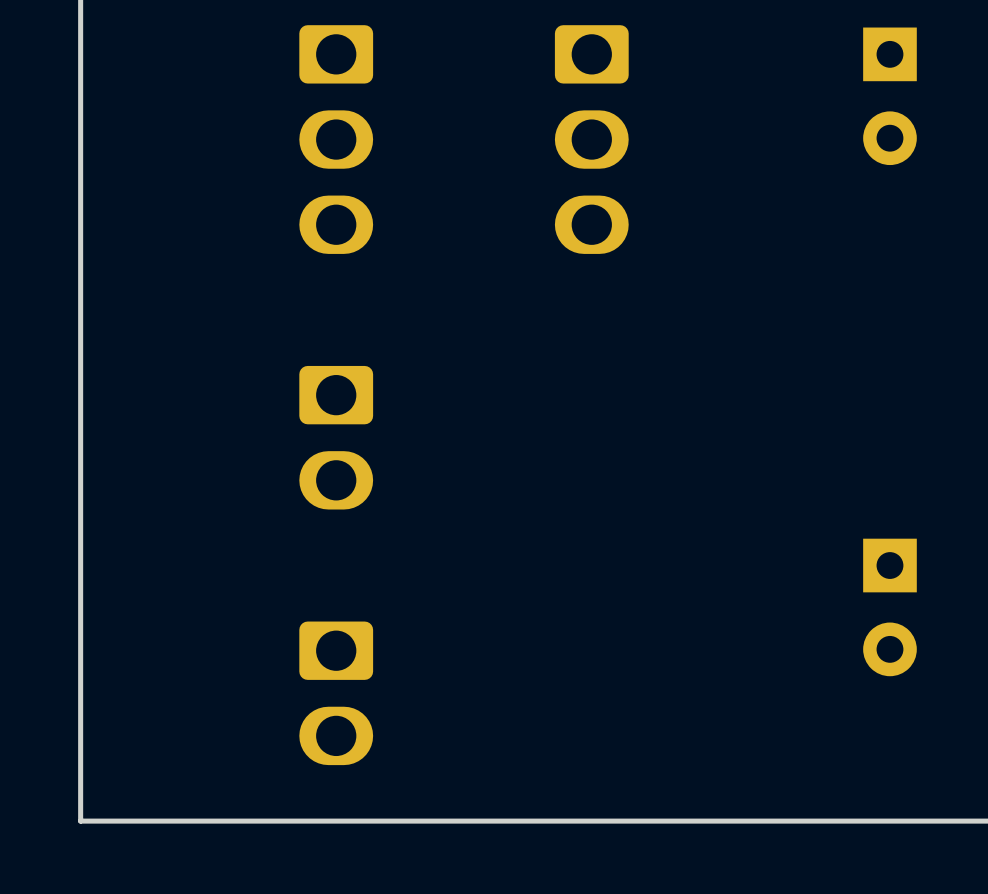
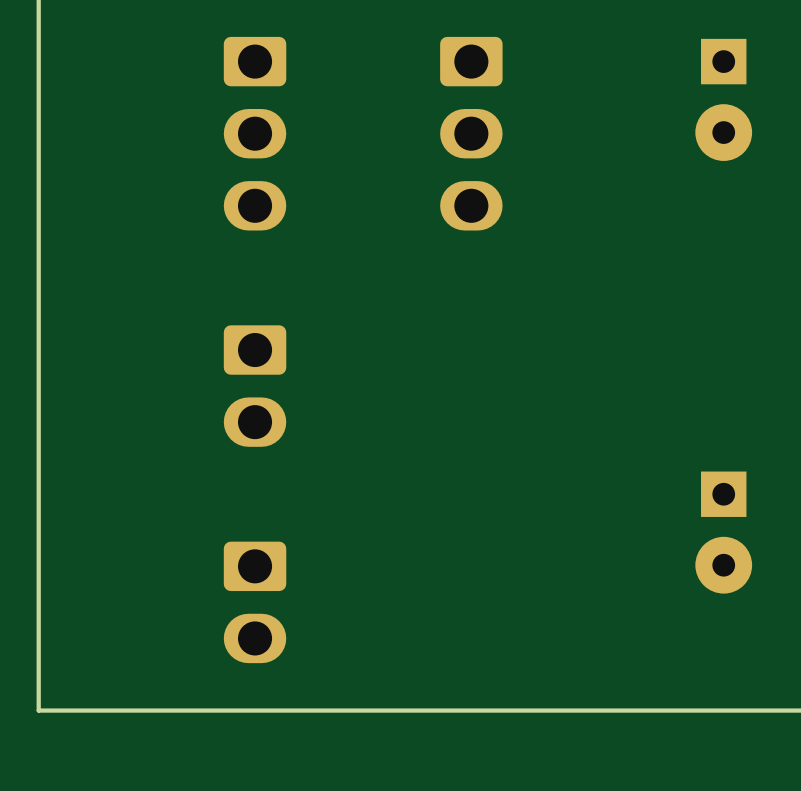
part footprint: [863, 27, 917, 166] -> [695, 38, 753, 161]
part footprint: [863, 538, 917, 677] -> [695, 471, 753, 594]

